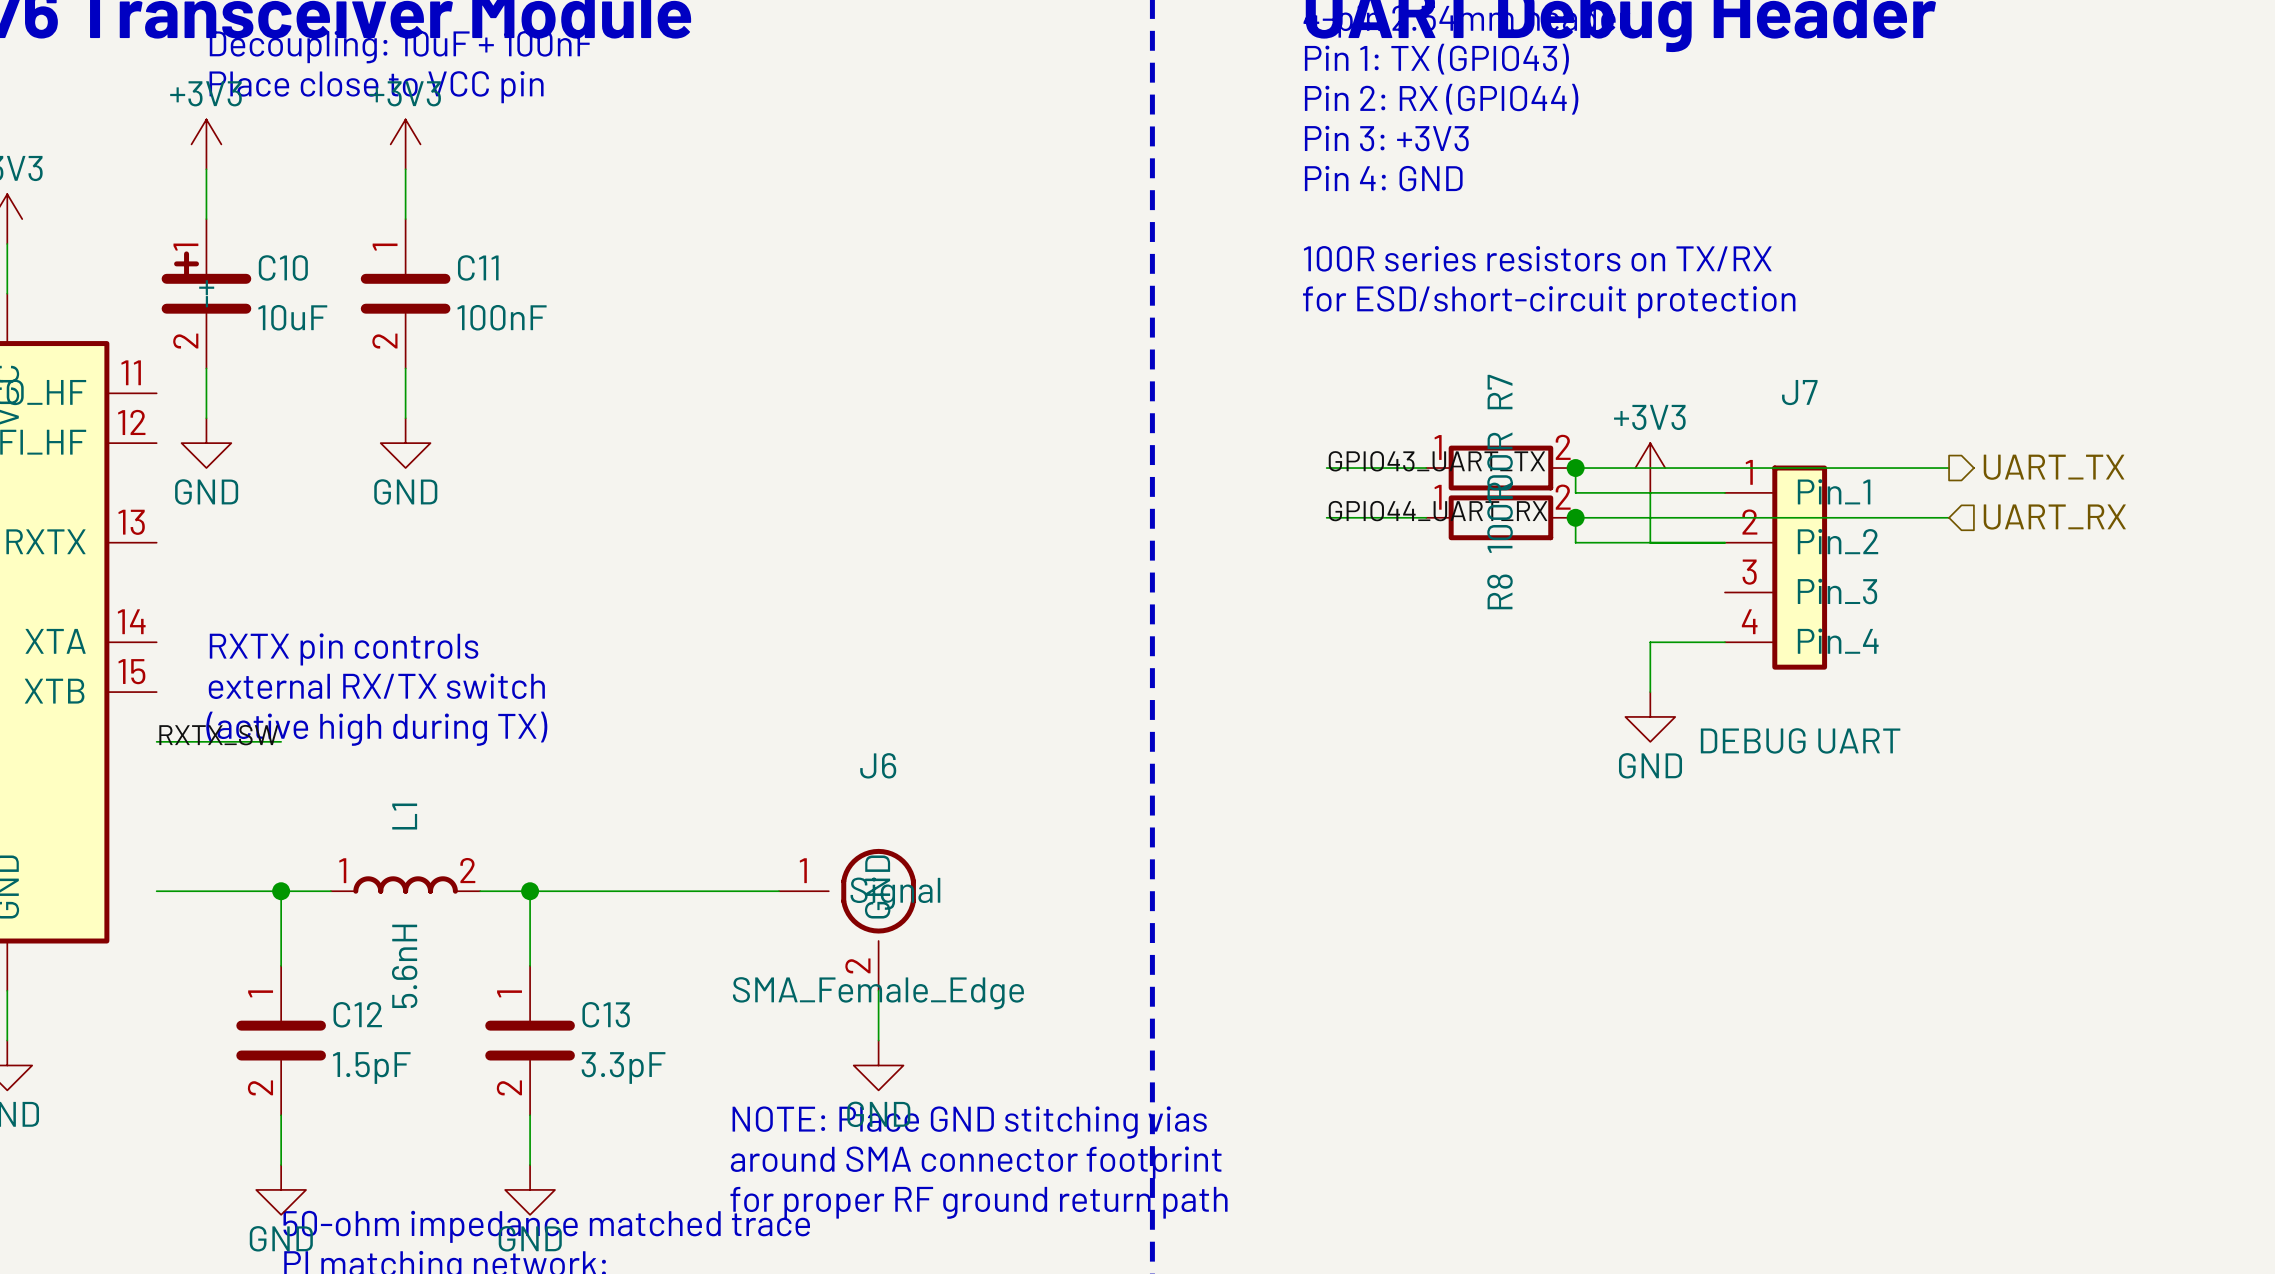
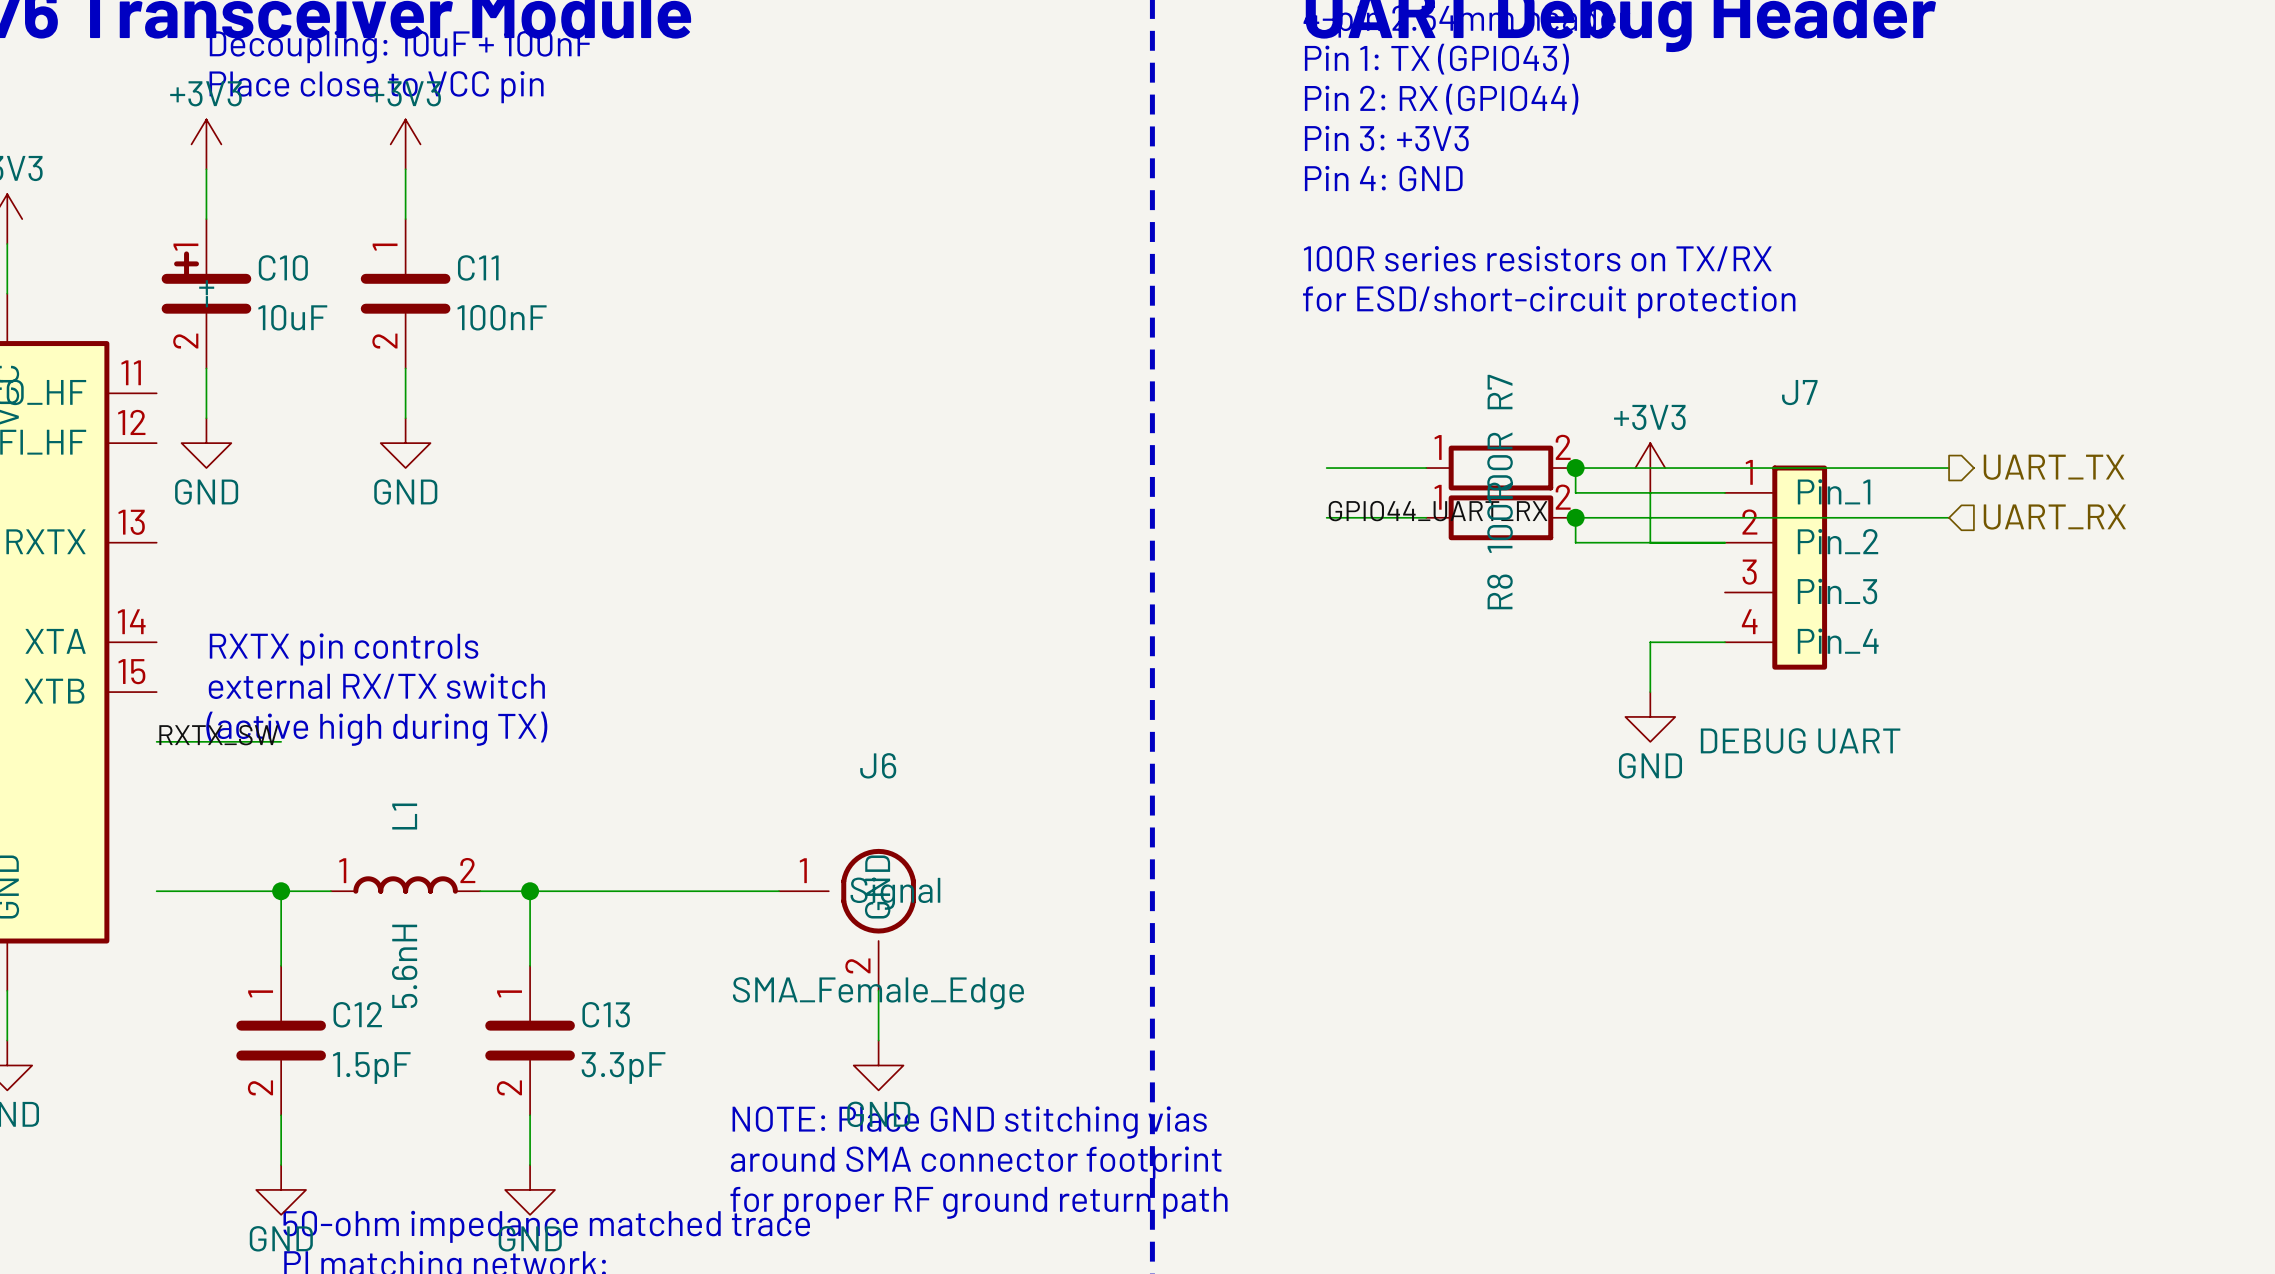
label: GPIO43_UART_TX (1436, 461) -> none

